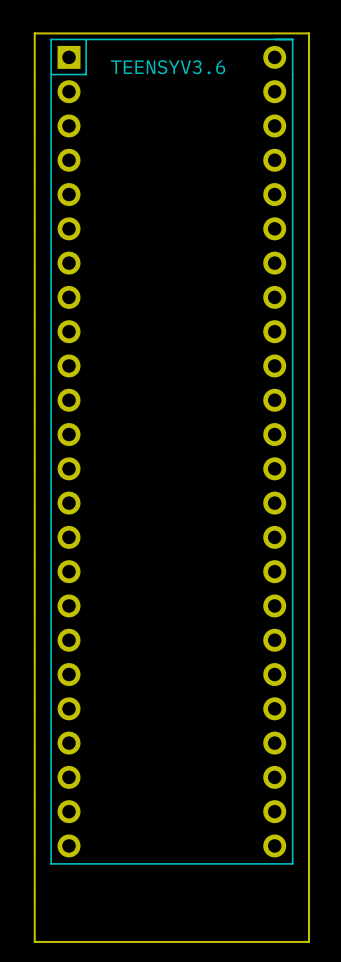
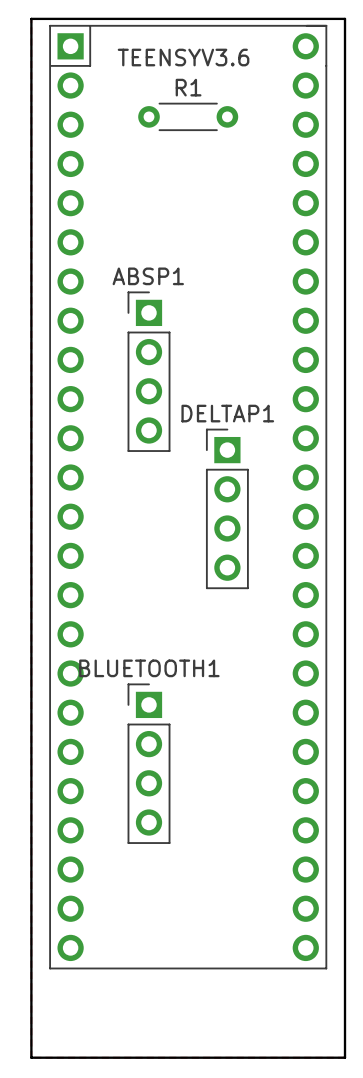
R1: none -> (188, 116)
ABSP1: none -> (149, 371)
DELTAP1: none -> (227, 508)
BLUETOOTH1: none -> (149, 763)

